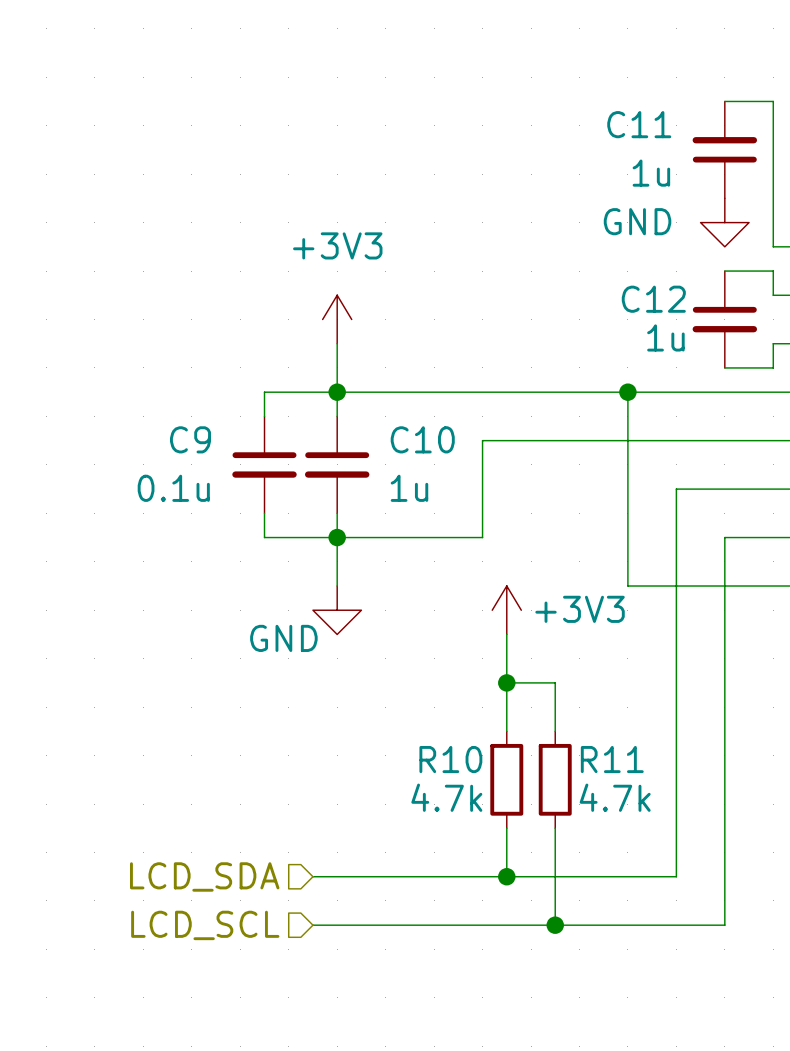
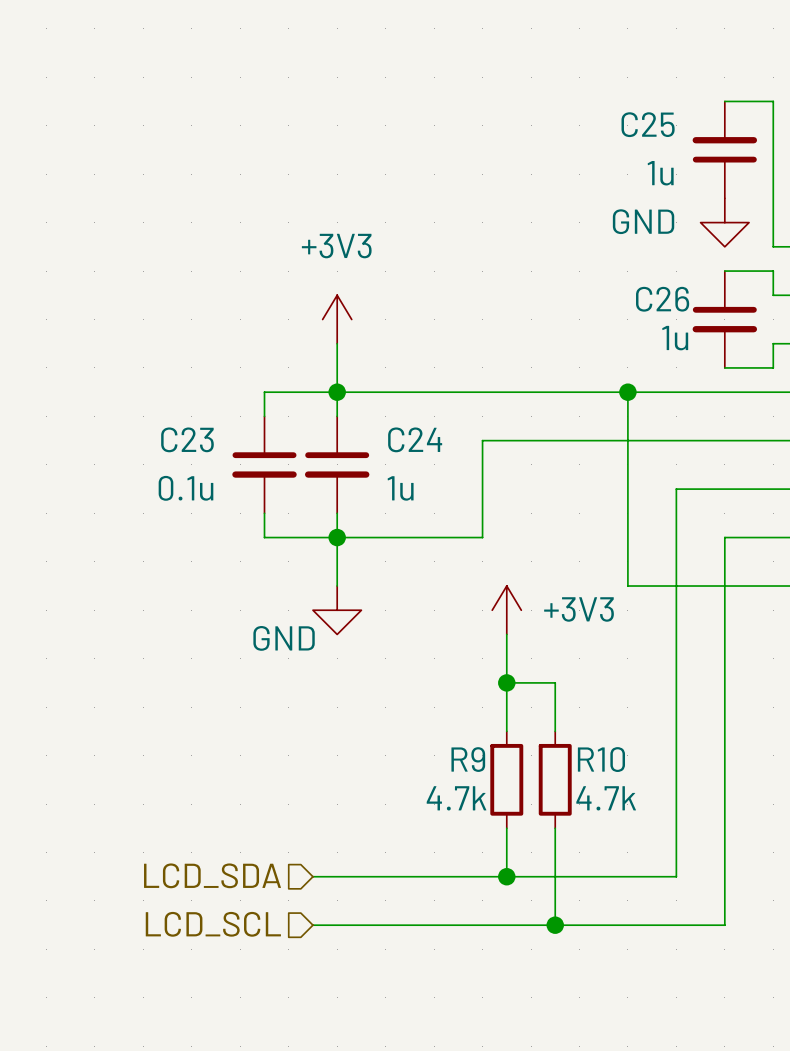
C11 name: C11 (639, 124) -> C25 (648, 124)
C12 name: C12 (653, 299) -> C26 (662, 299)
C9 name: C9 (190, 439) -> C23 (187, 439)
C10 name: C10 (422, 439) -> C24 (415, 439)
R10 name: R10 (450, 759) -> R9 (468, 759)
R11 name: R11 (612, 759) -> R10 (601, 759)

